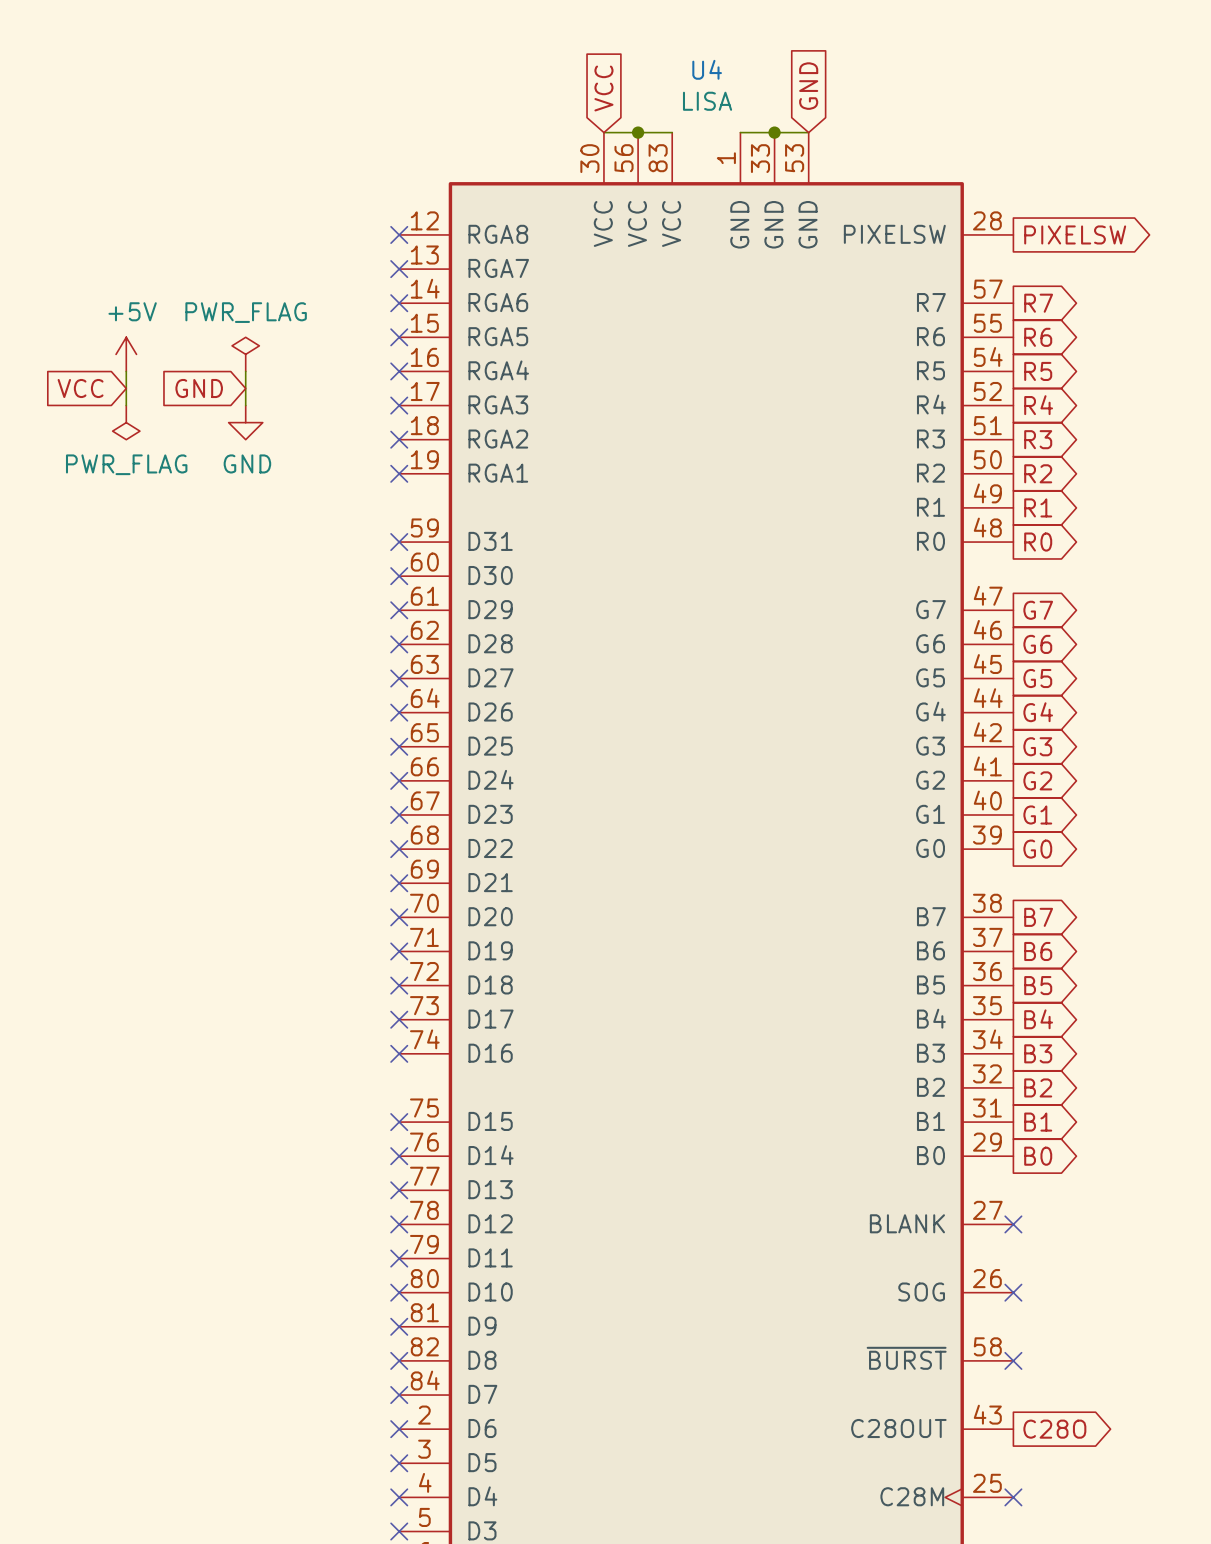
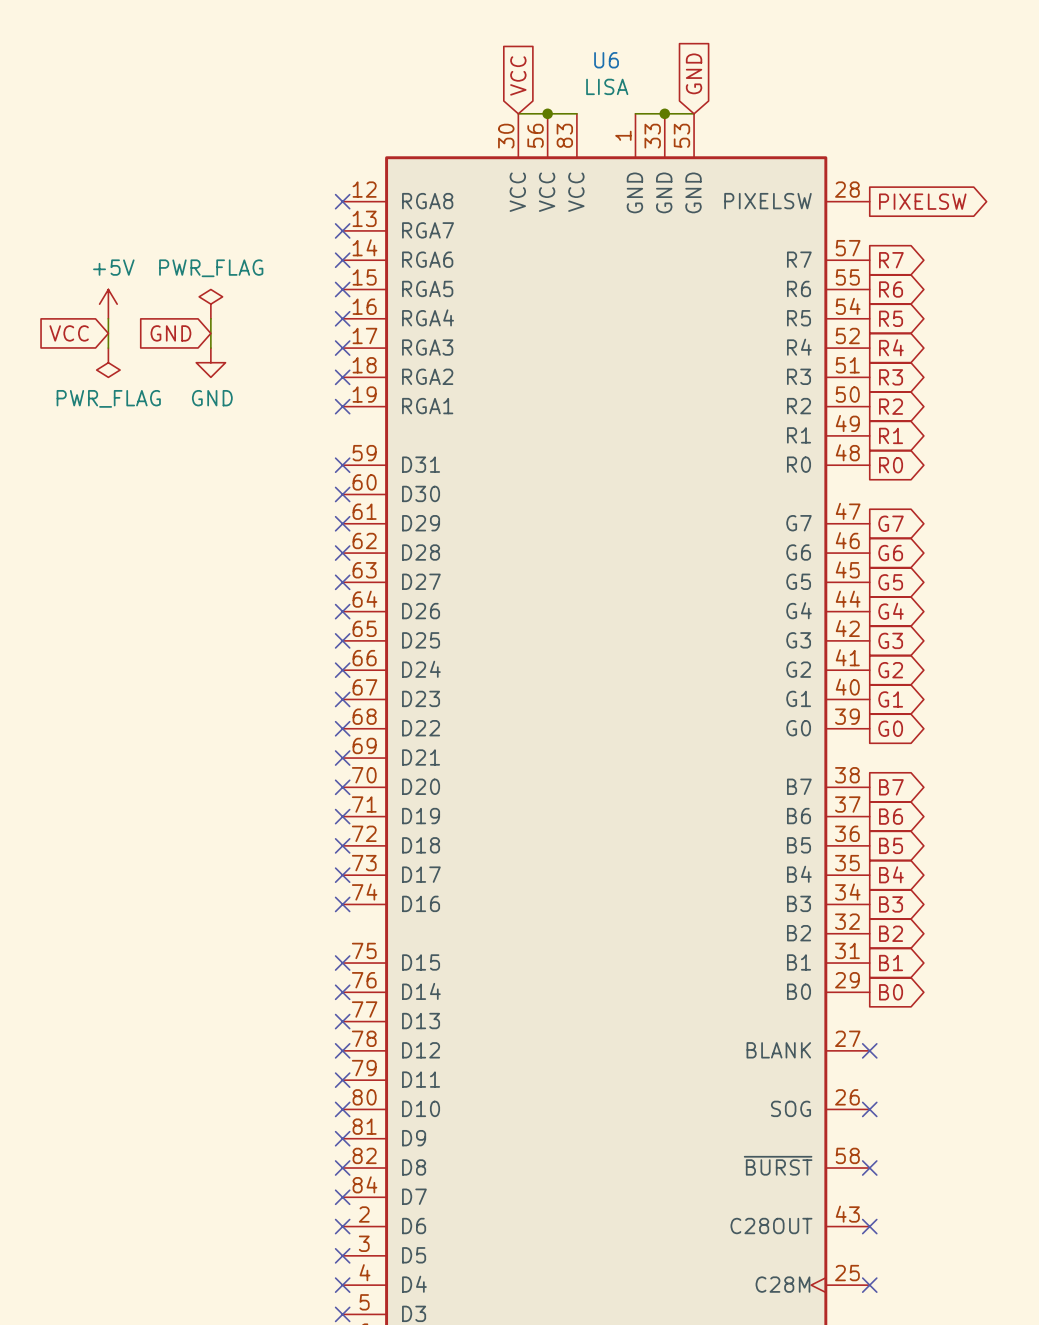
U4 name: U4 (707, 69) -> U6 (606, 60)
no-connect mark: none -> (869, 1226)
global label: C28O (1054, 1429) -> none

